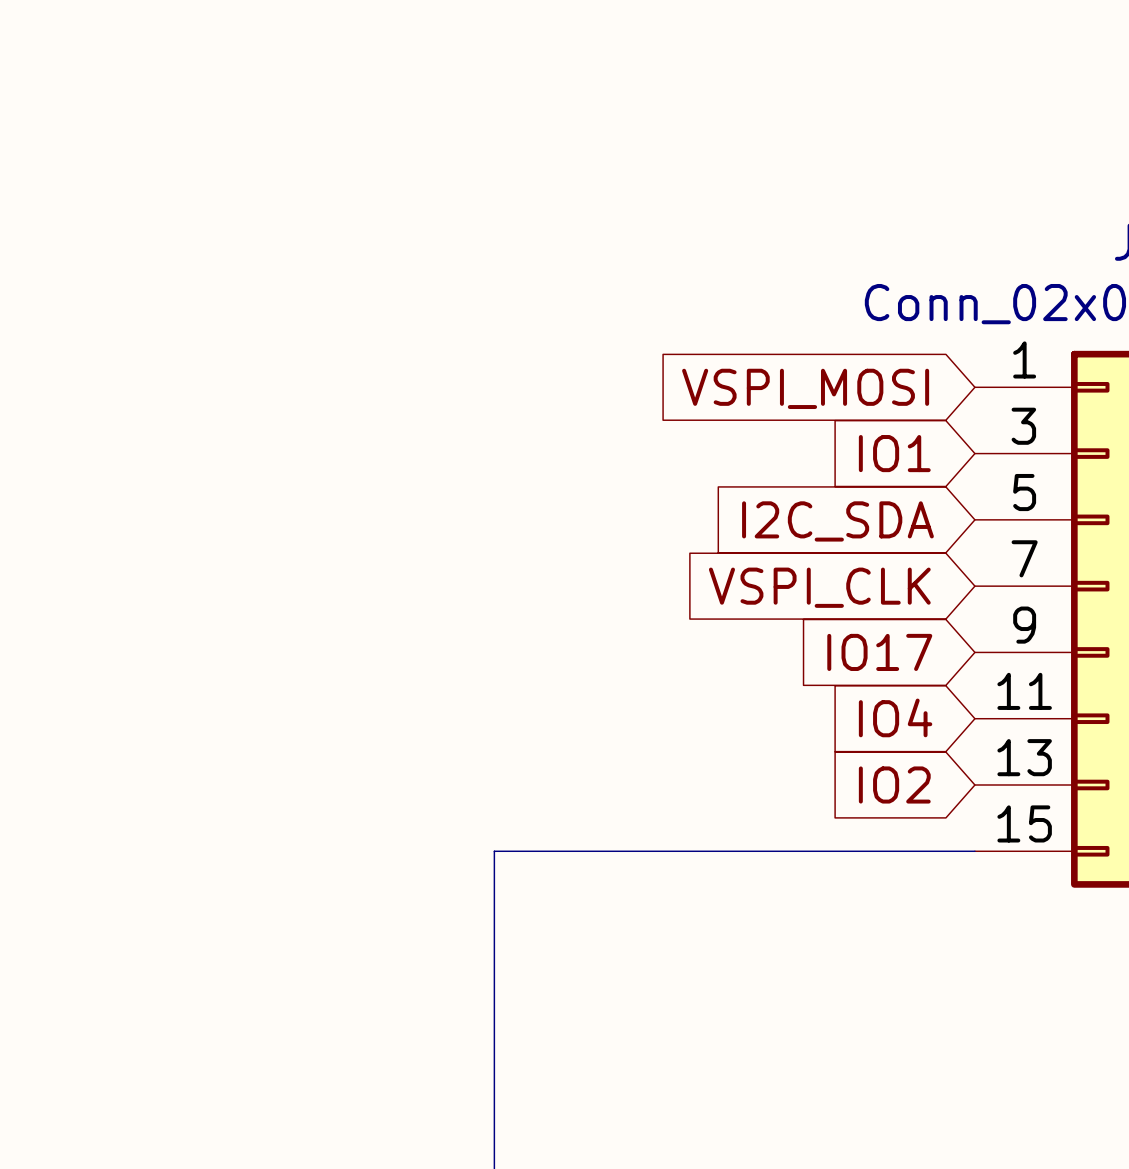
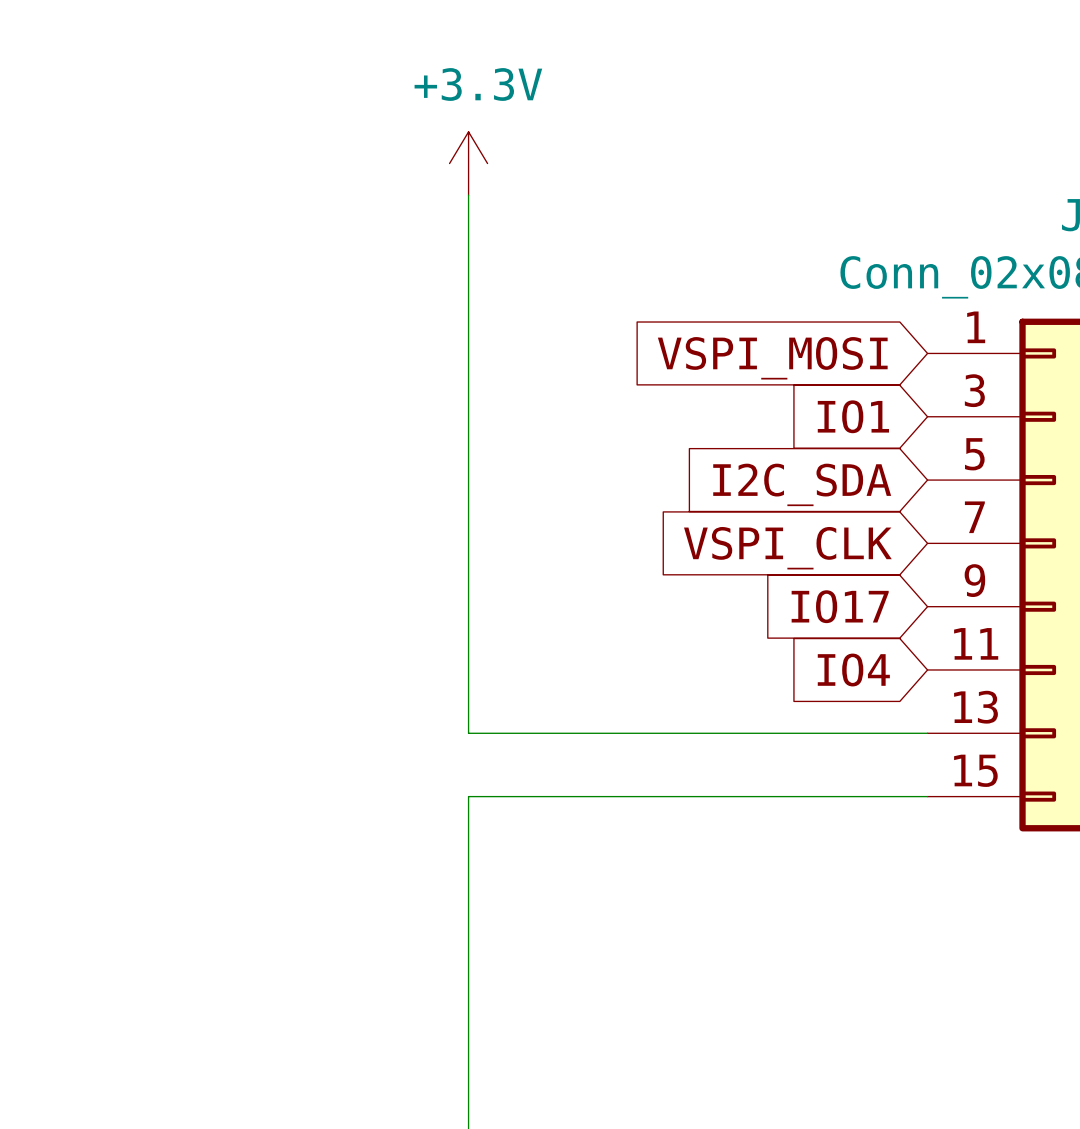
power symbol: none -> +3.3V (468, 163)
wire: none -> (468, 195) (468, 733) (927, 733)
global label: IO2 (894, 784) -> none

